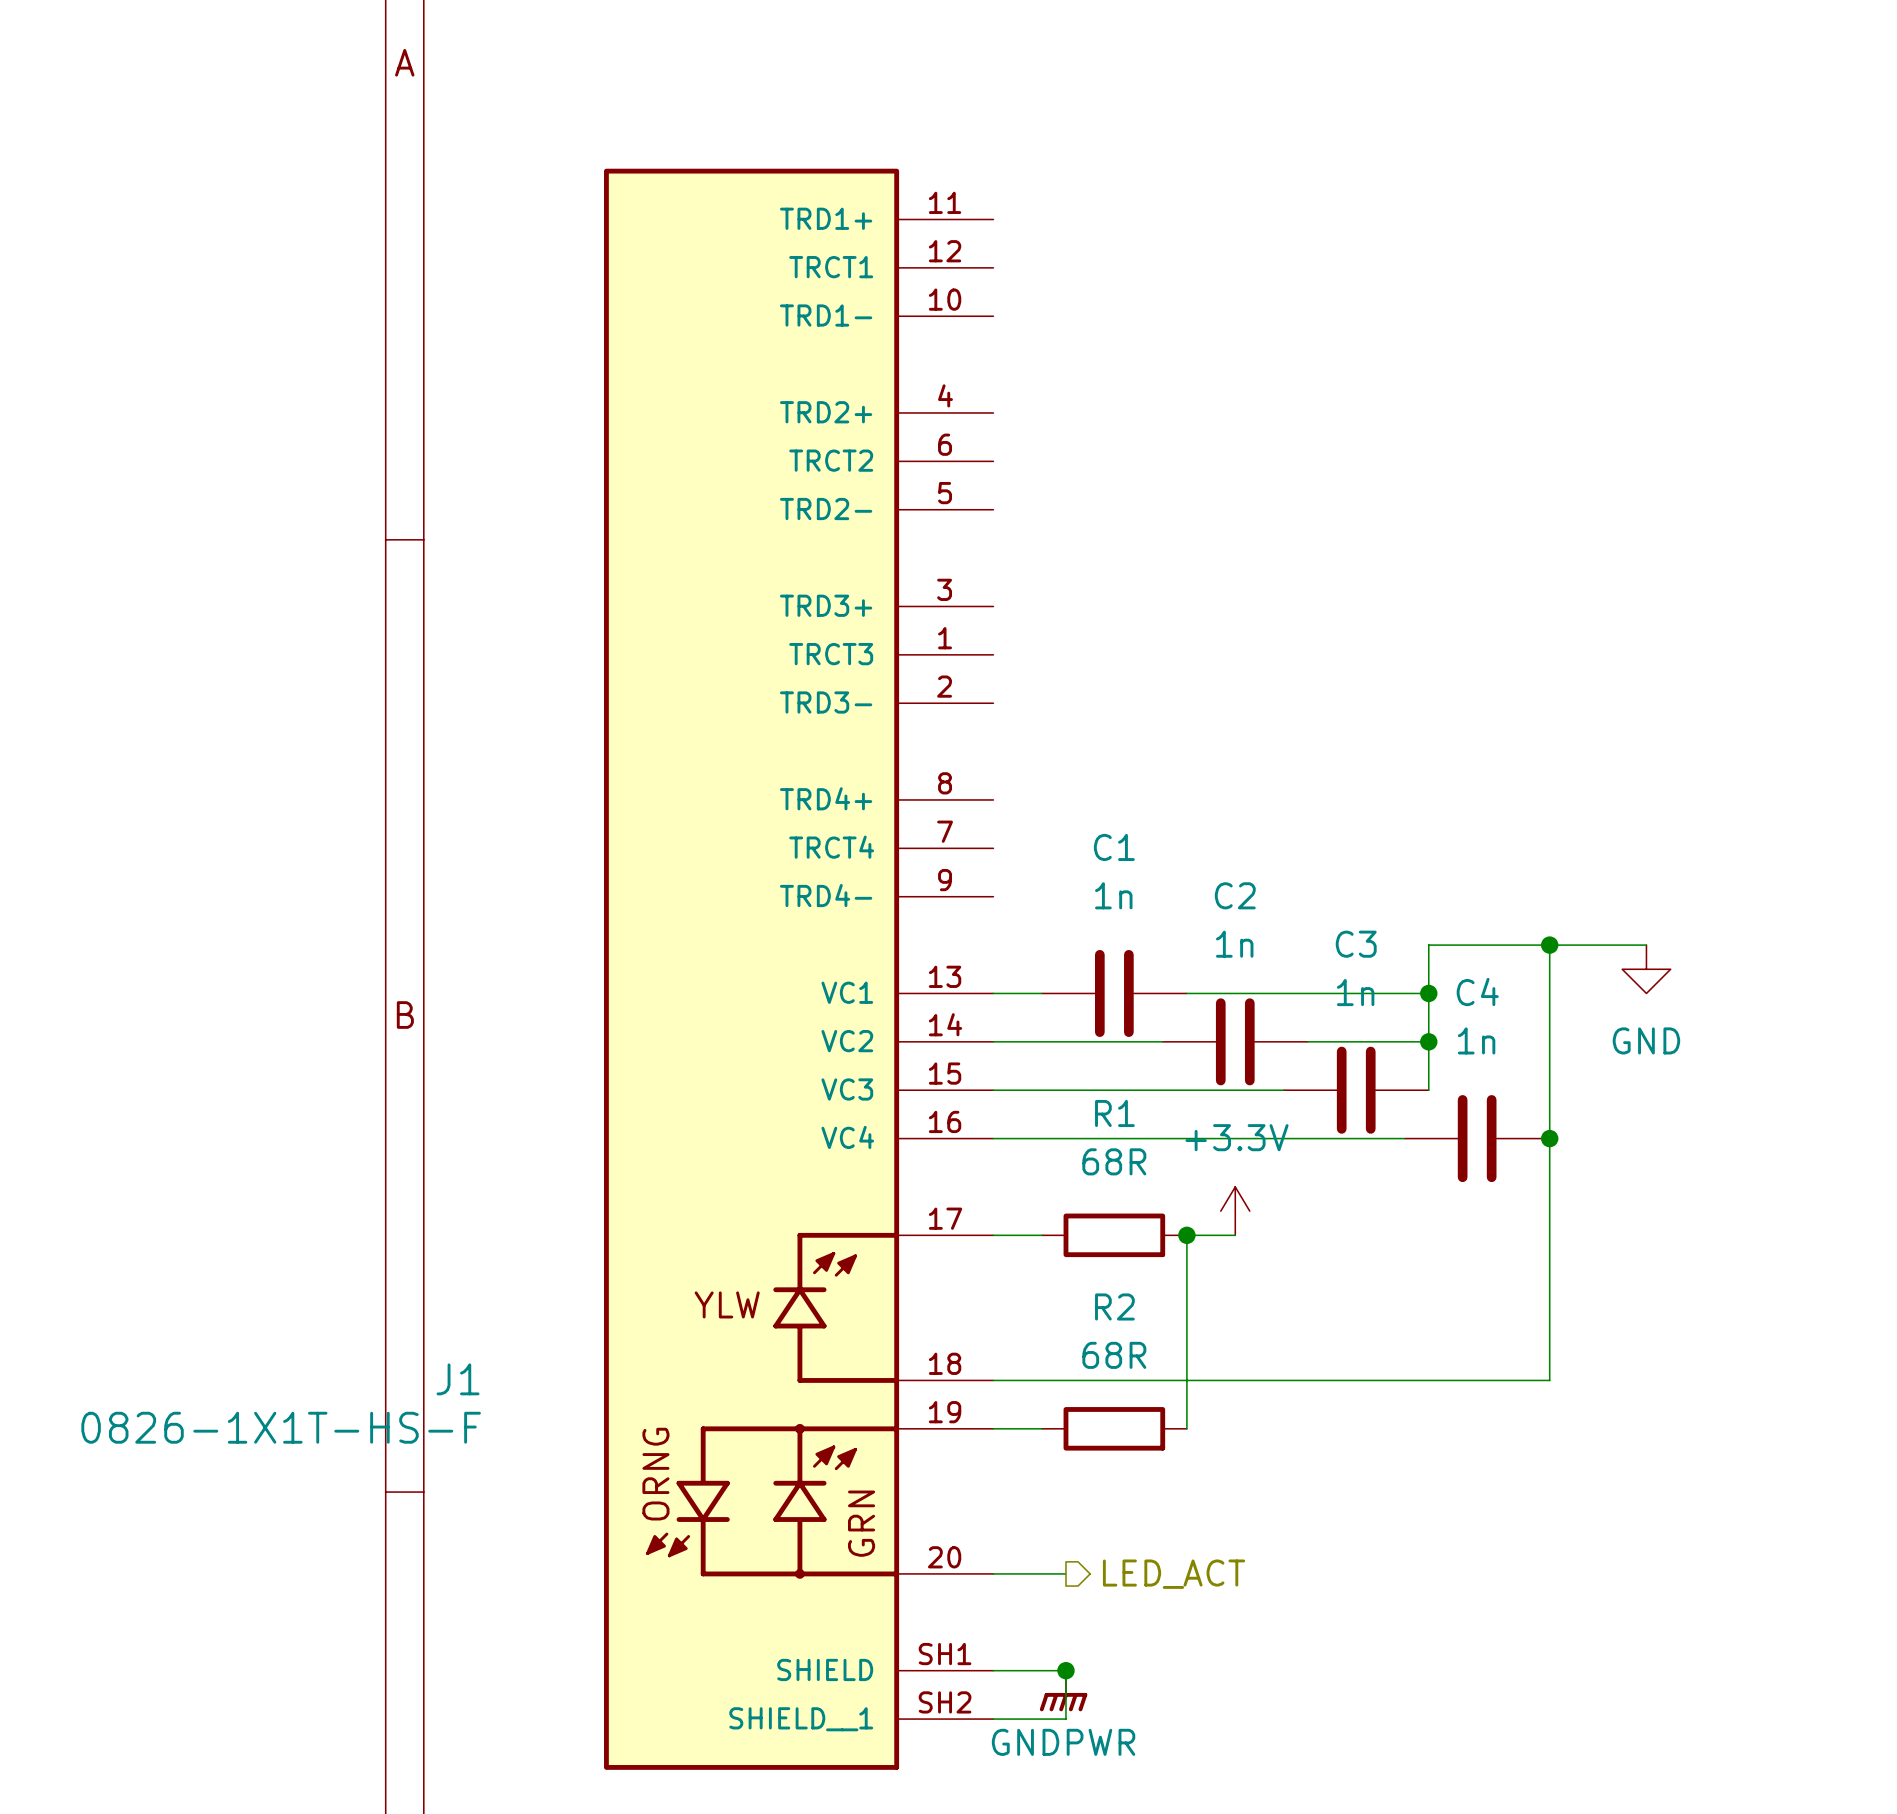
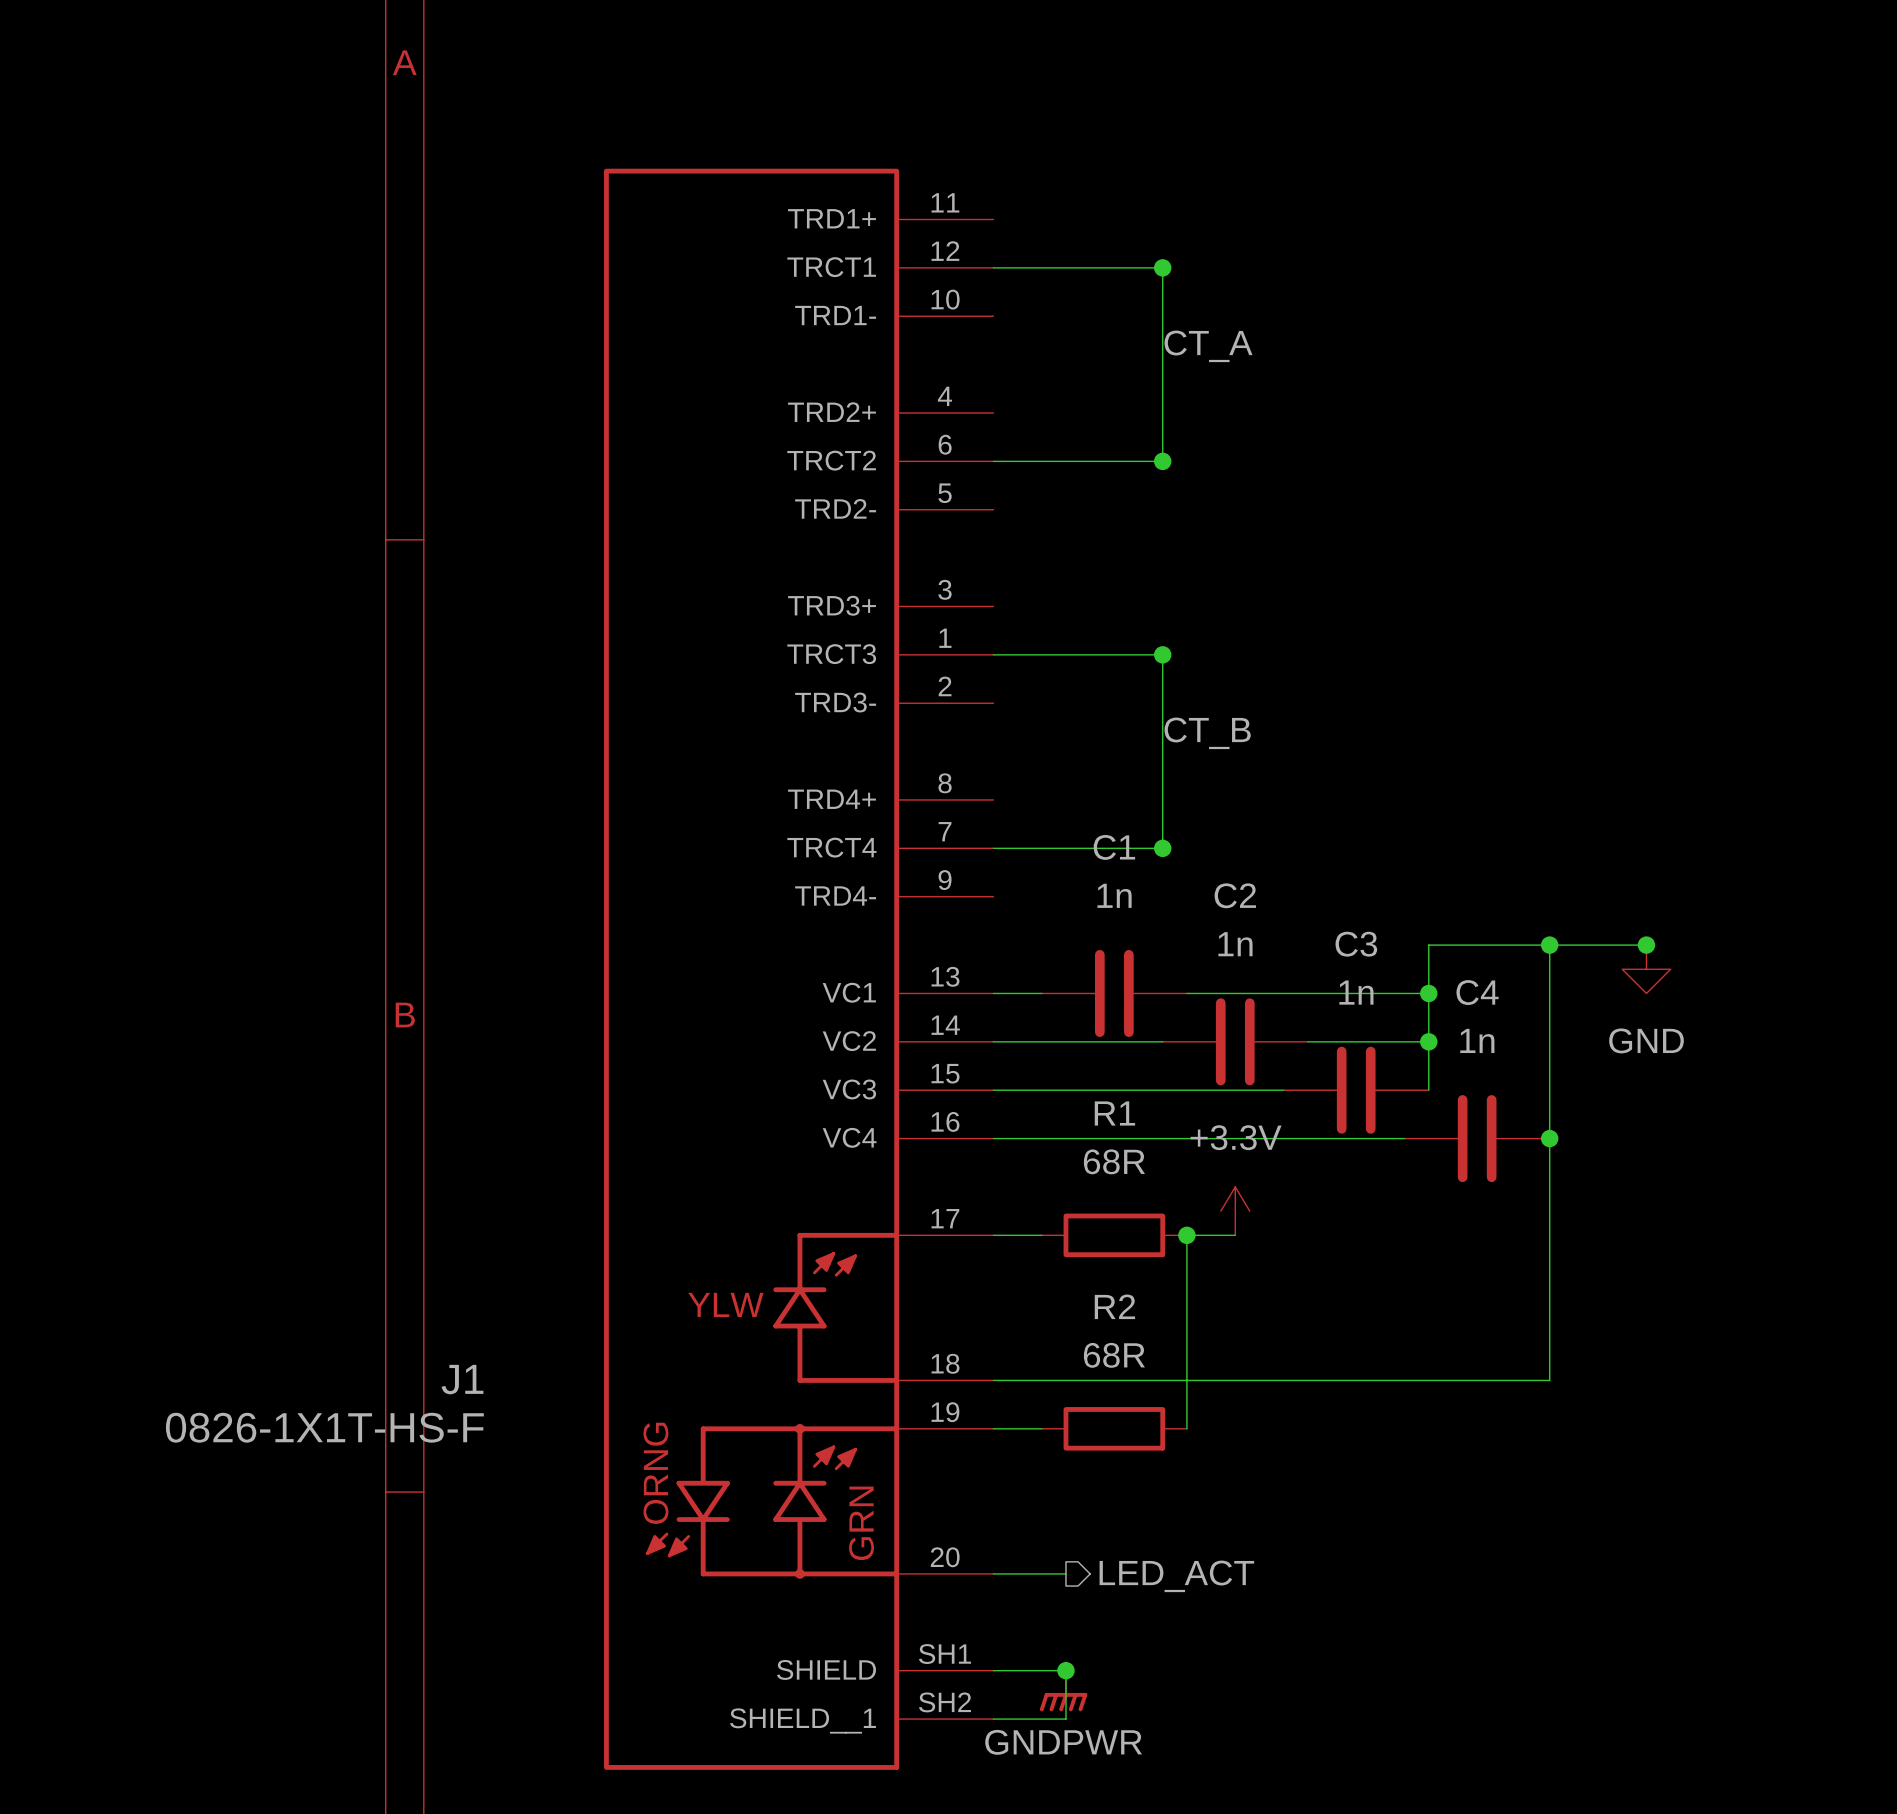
wire: none -> (993, 267) (1162, 267) (1162, 461) (993, 461)
junction: none -> (1162, 267)
label: none -> CT_A (1208, 346)
junction: none -> (1162, 461)
wire: none -> (993, 654) (1162, 654) (1162, 848) (993, 848)
junction: none -> (1162, 654)
label: none -> CT_B (1207, 733)
junction: none -> (1162, 848)
junction: none -> (1646, 945)

